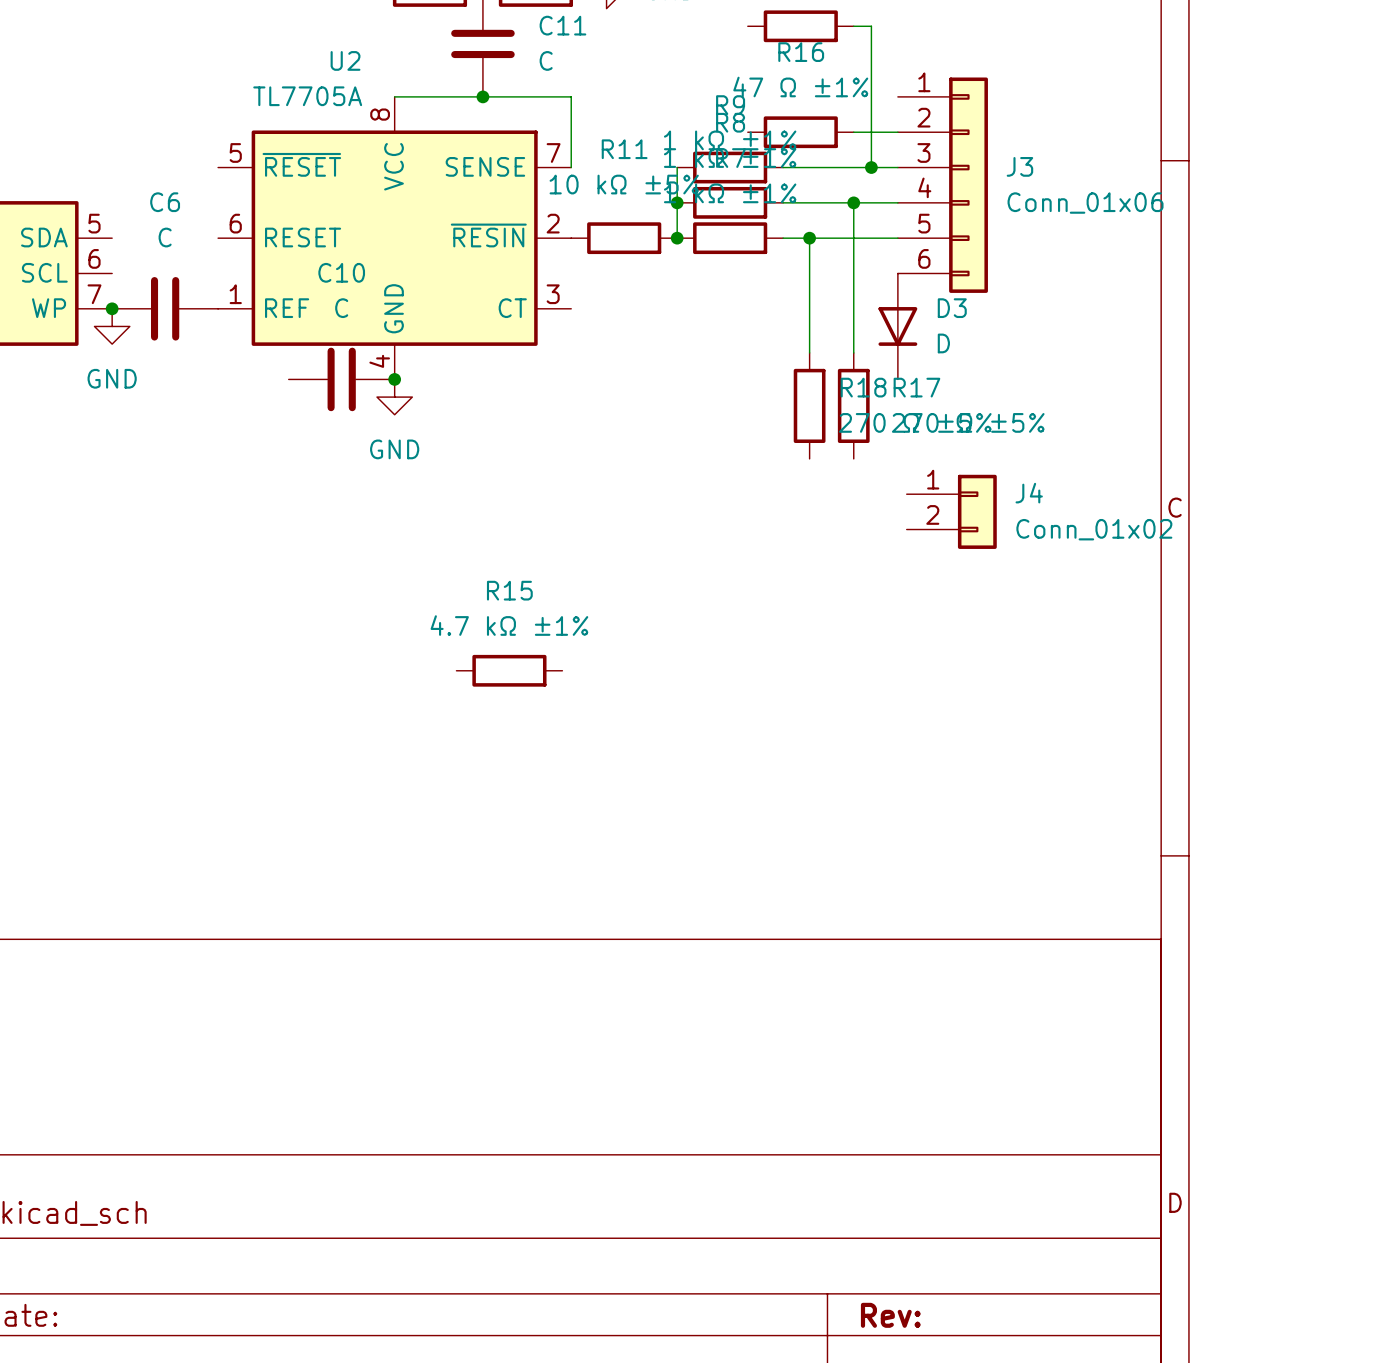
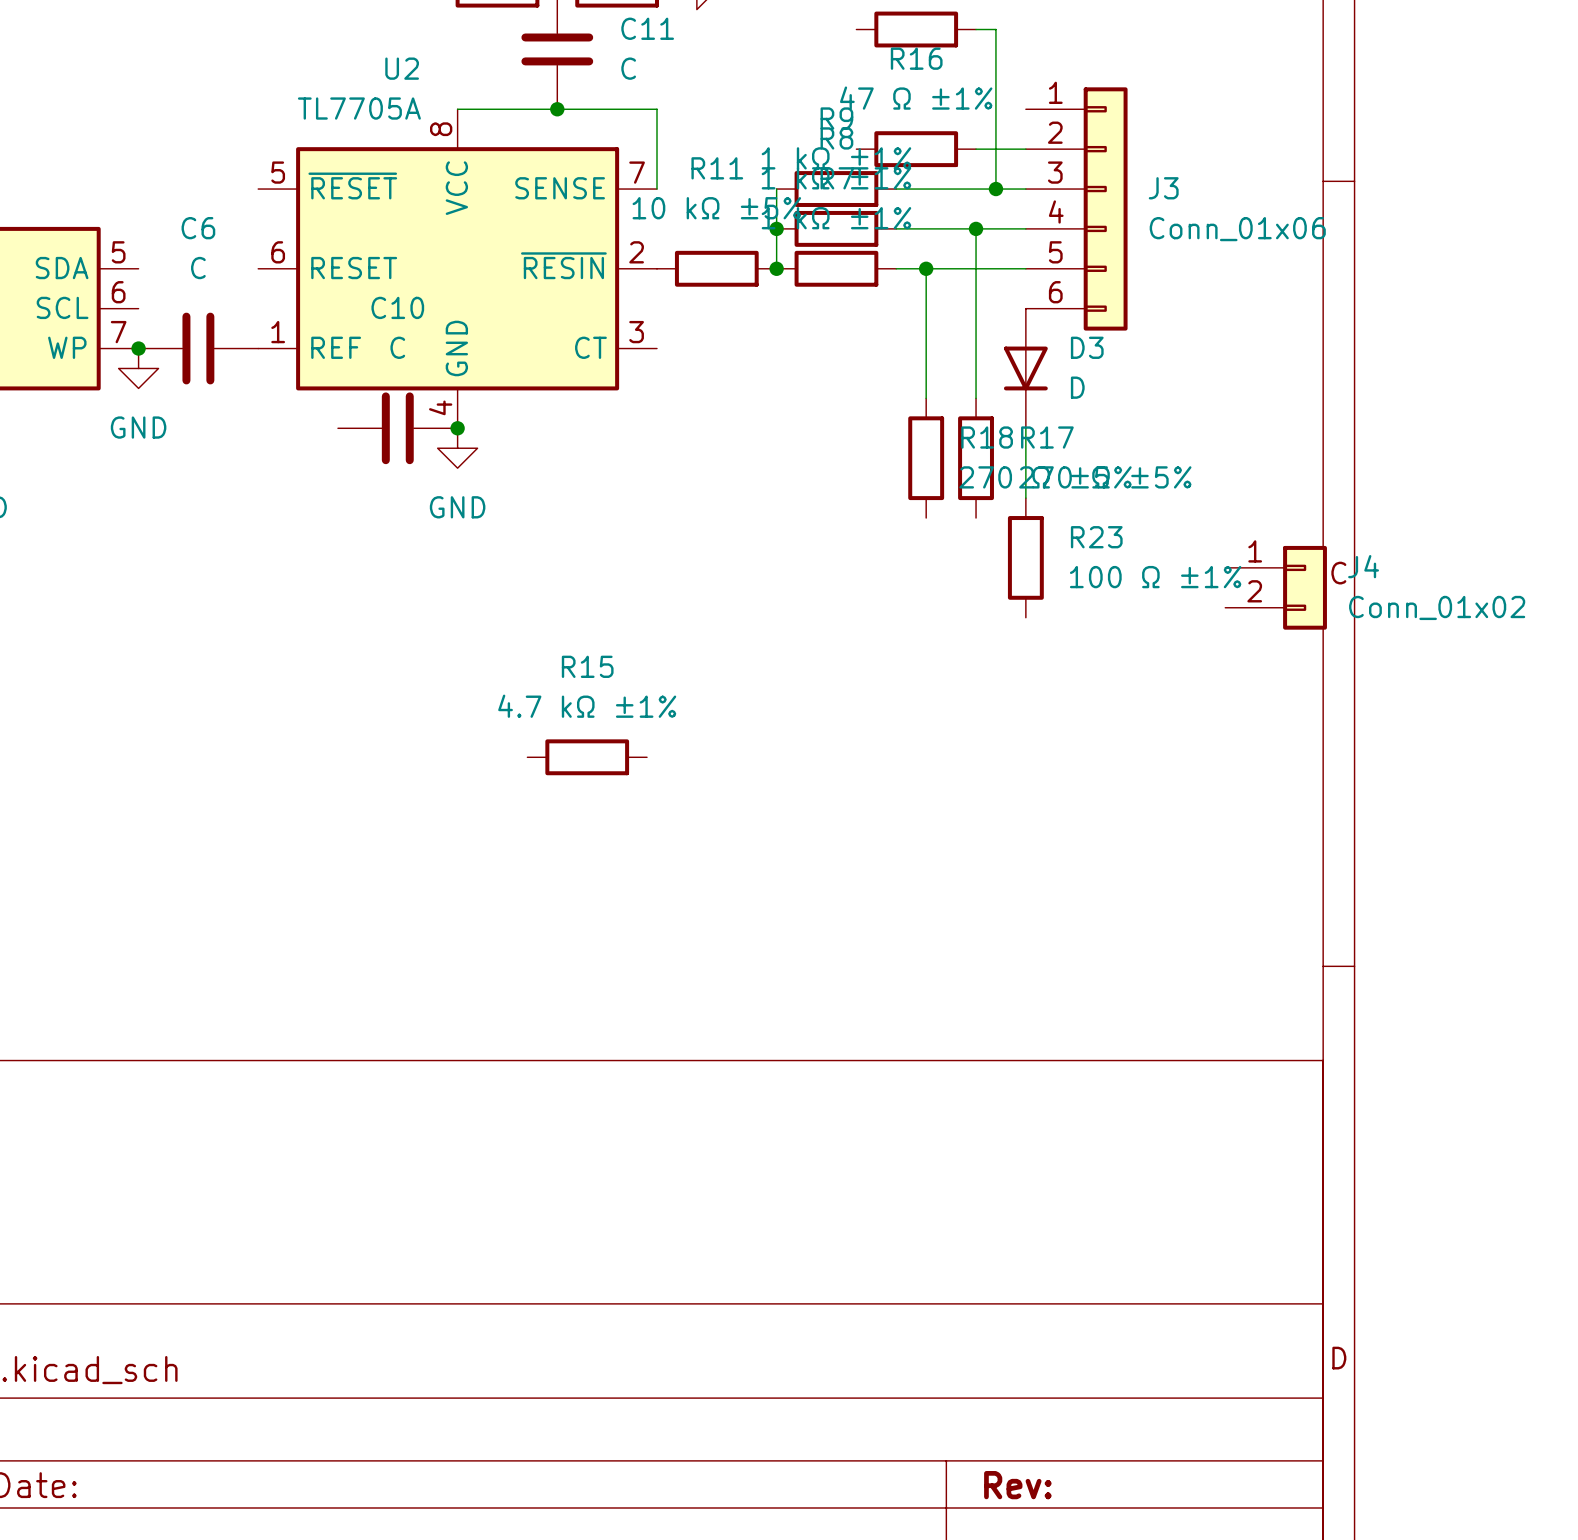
wire: none -> (1025, 428) (1025, 498)
R23: none -> 100 Ω ±1% (1025, 557)
J4 position: (951, 511) -> (1276, 587)

